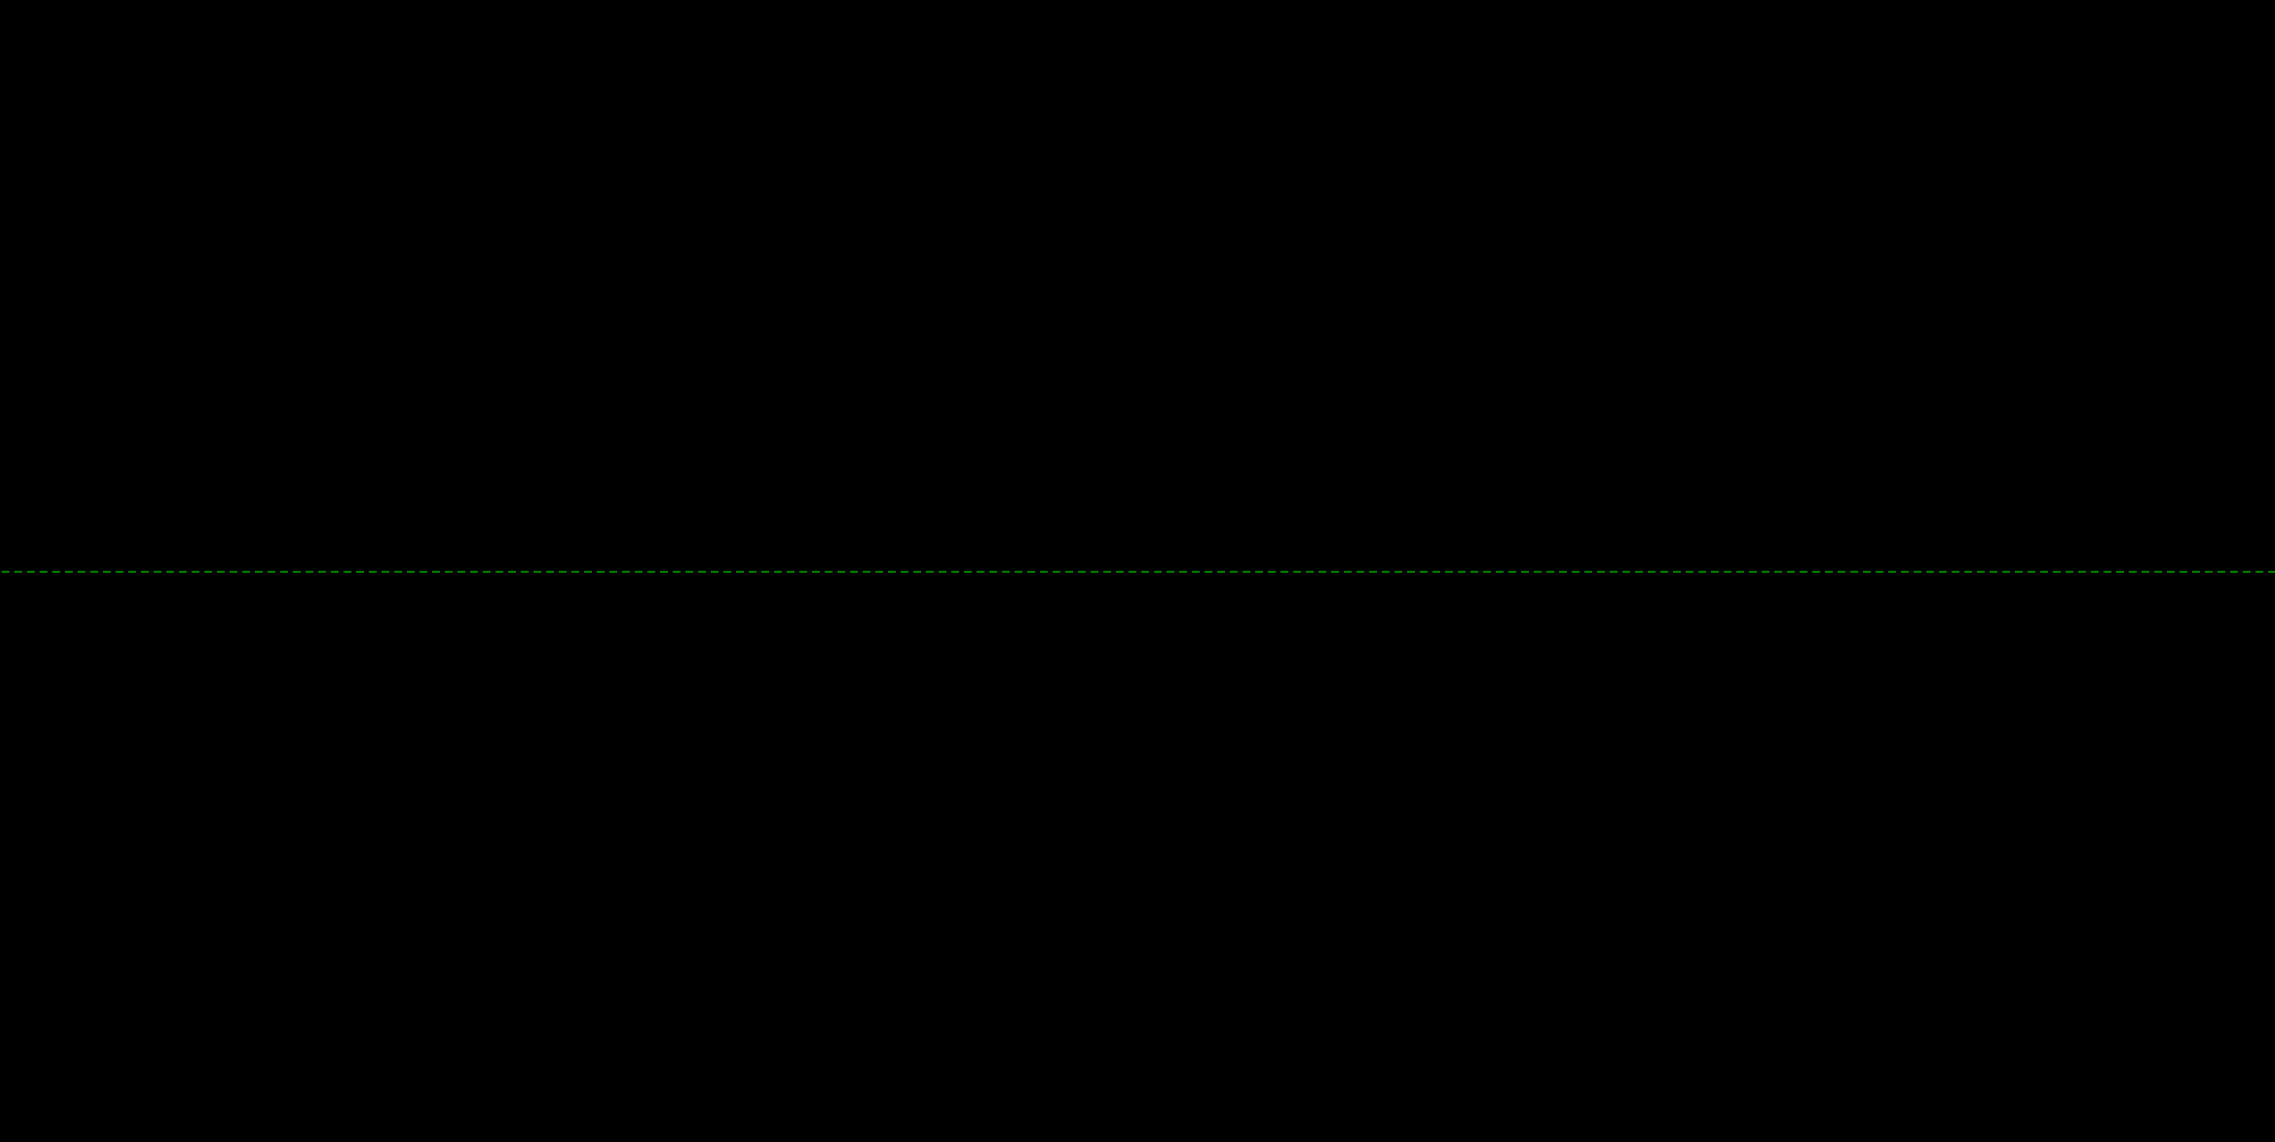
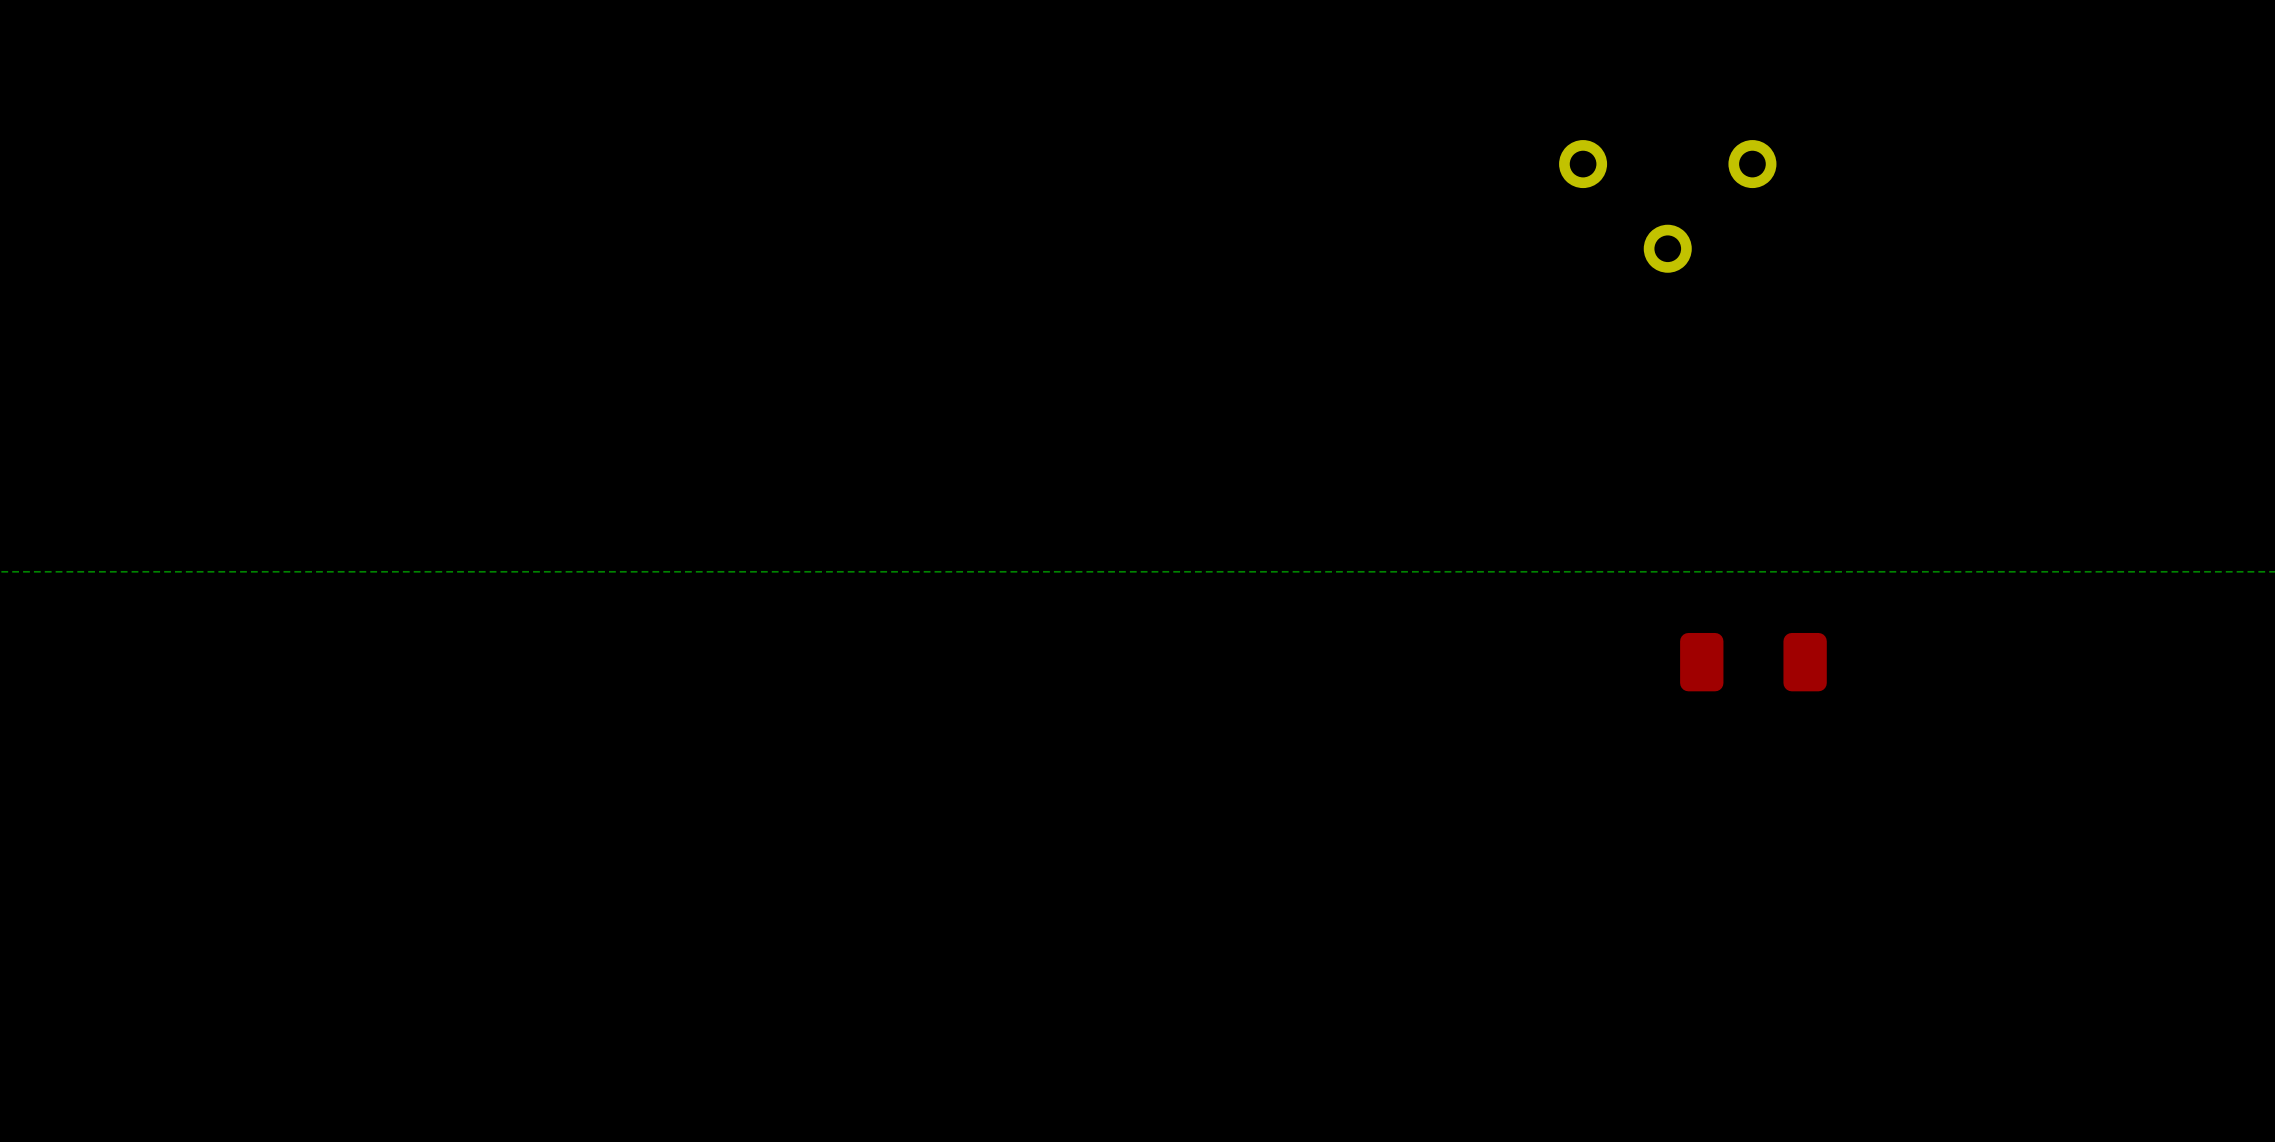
part: none -> (1667, 206)
part: none -> (1753, 662)

